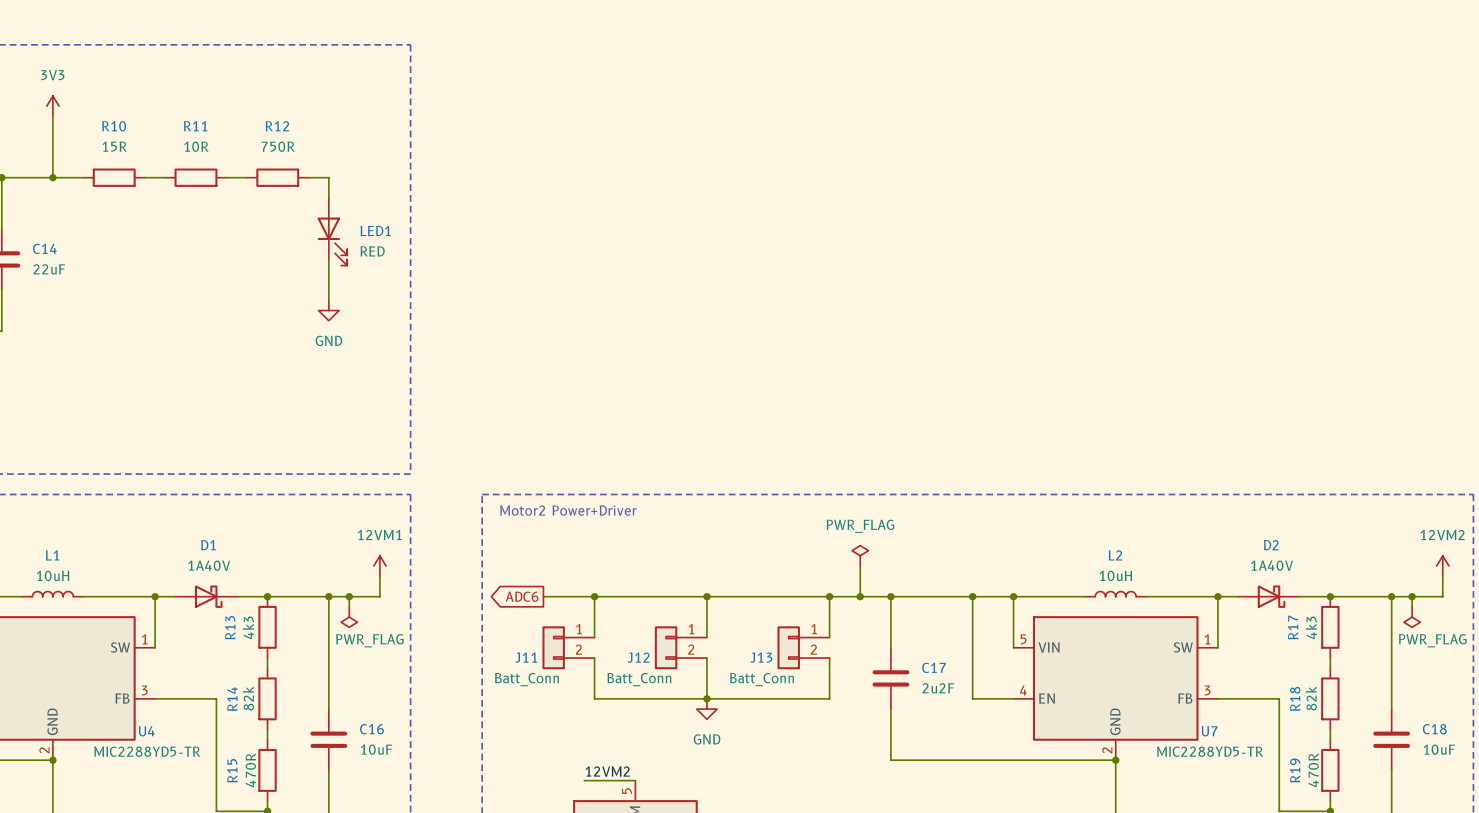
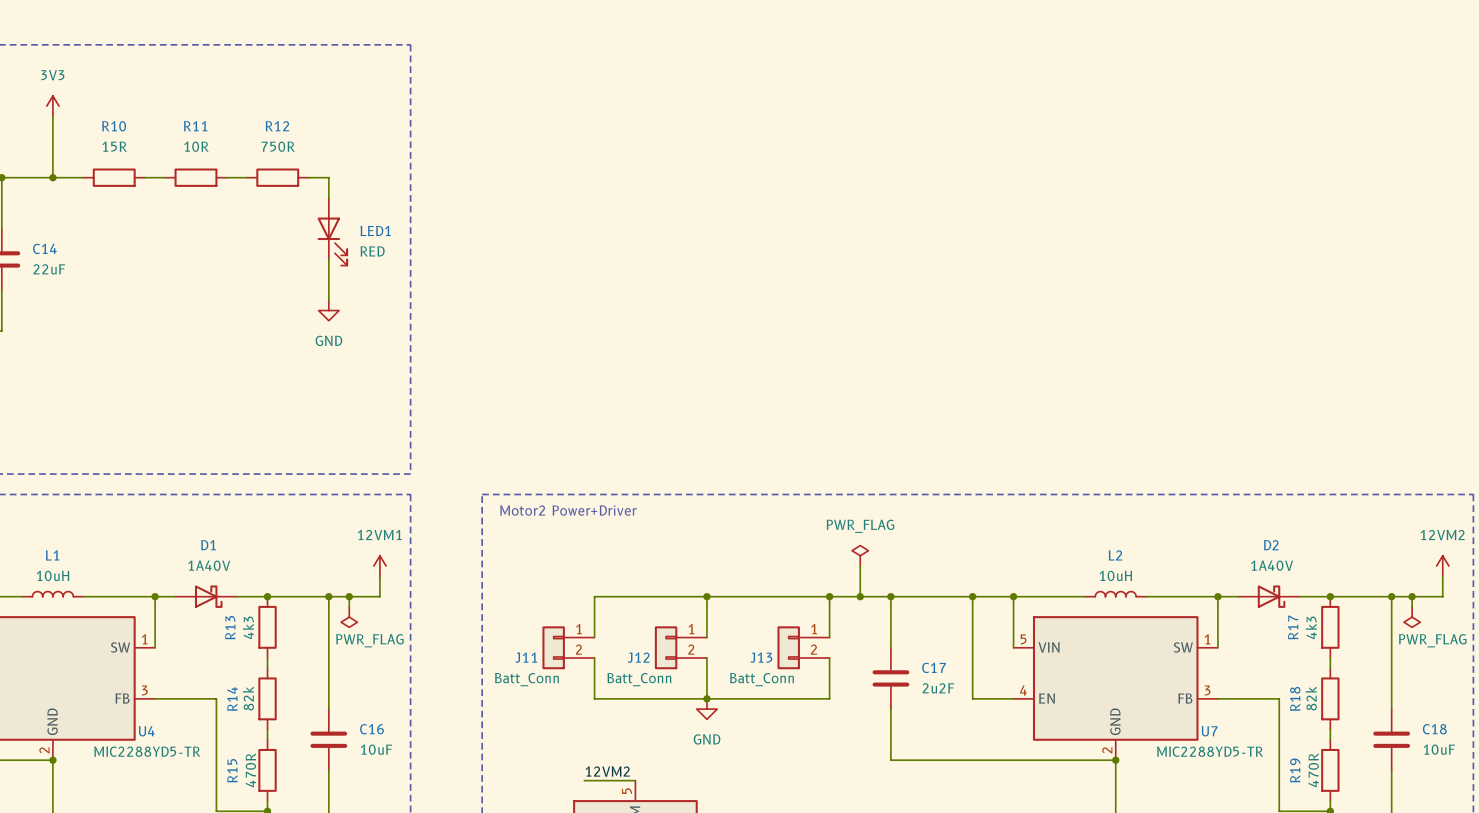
global label: ADC6 (522, 596) -> none
wire: (543, 596) (594, 596) -> none
junction: (594, 596) -> none

